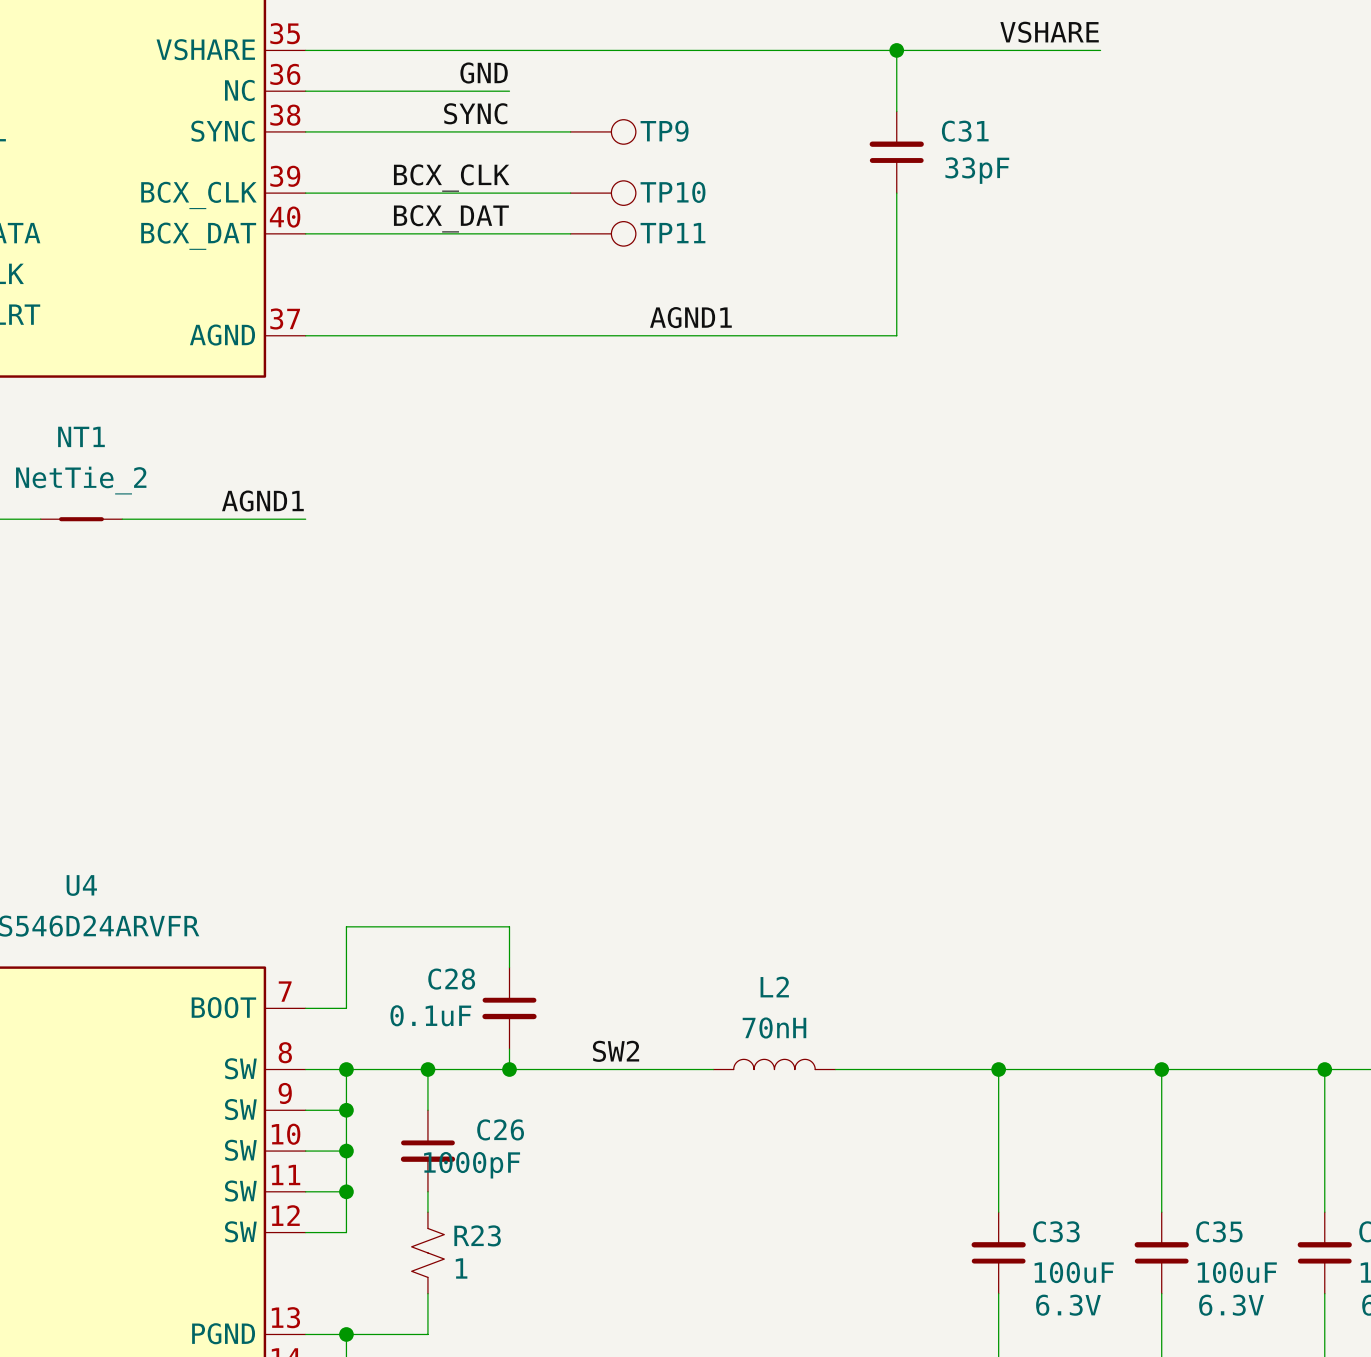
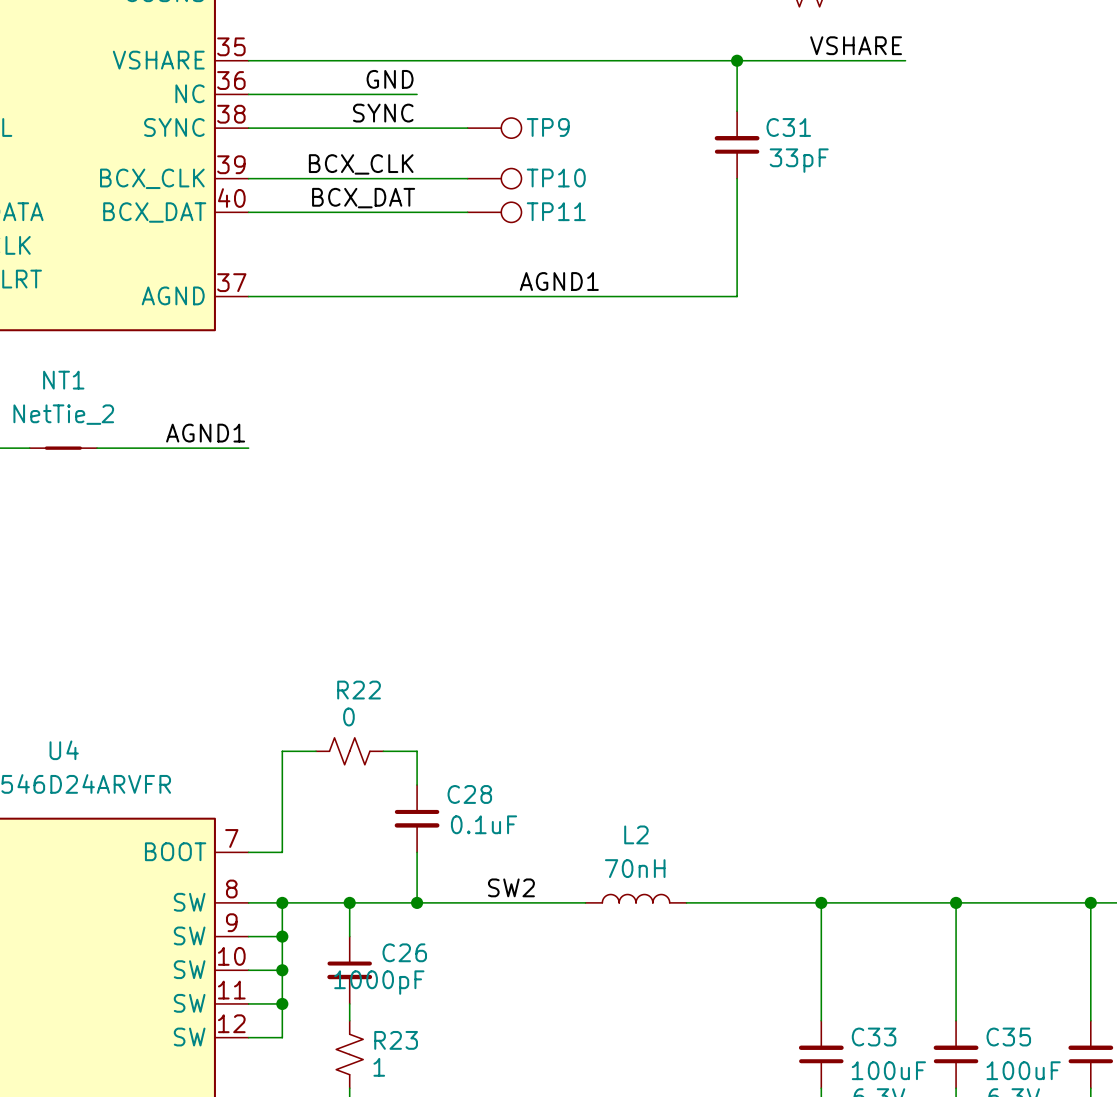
R22: none -> 0 (349, 751)
wire: none -> (383, 751) (417, 751) (417, 785)
wire: (346, 926) (509, 926) (509, 967) -> (282, 785) (282, 751) (316, 751)
C28 name position: C28 (451, 979) -> C28 (469, 794)
C28 position: (509, 1008) -> (417, 818)
C28 value position: 0.1uF (430, 1015) -> 0.1uF (484, 824)

